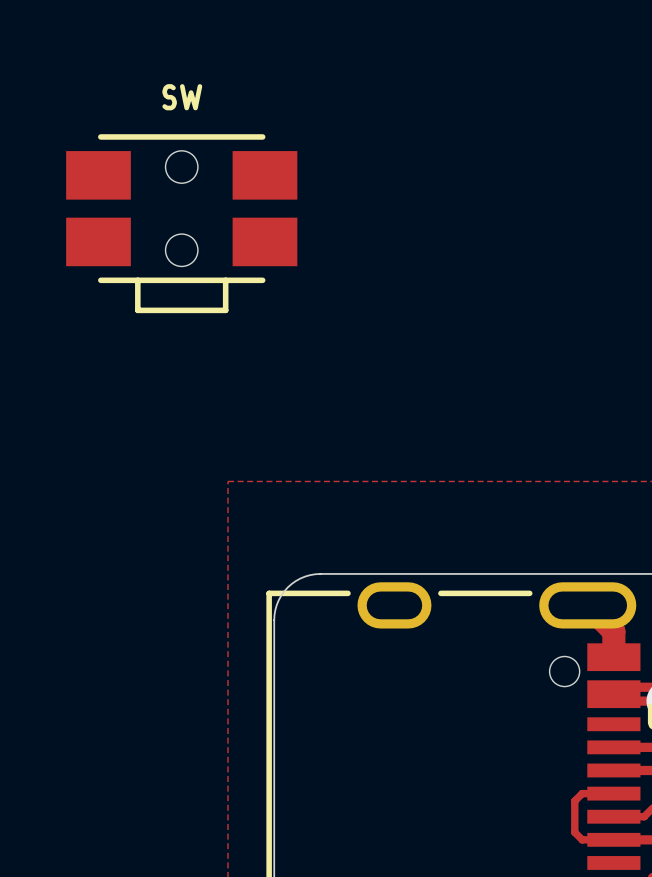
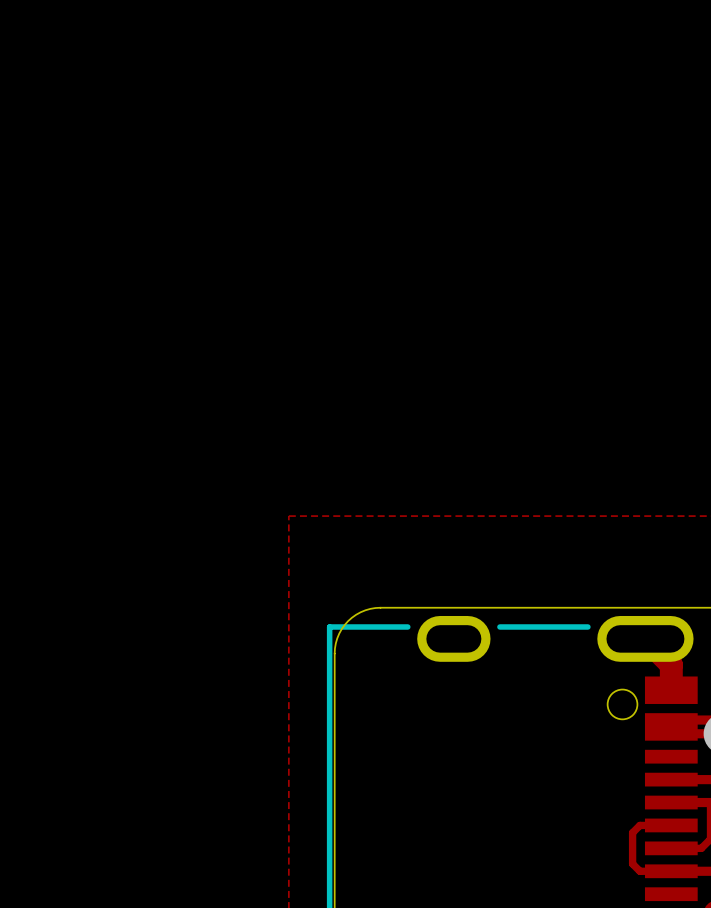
sw: (181, 223) -> none

